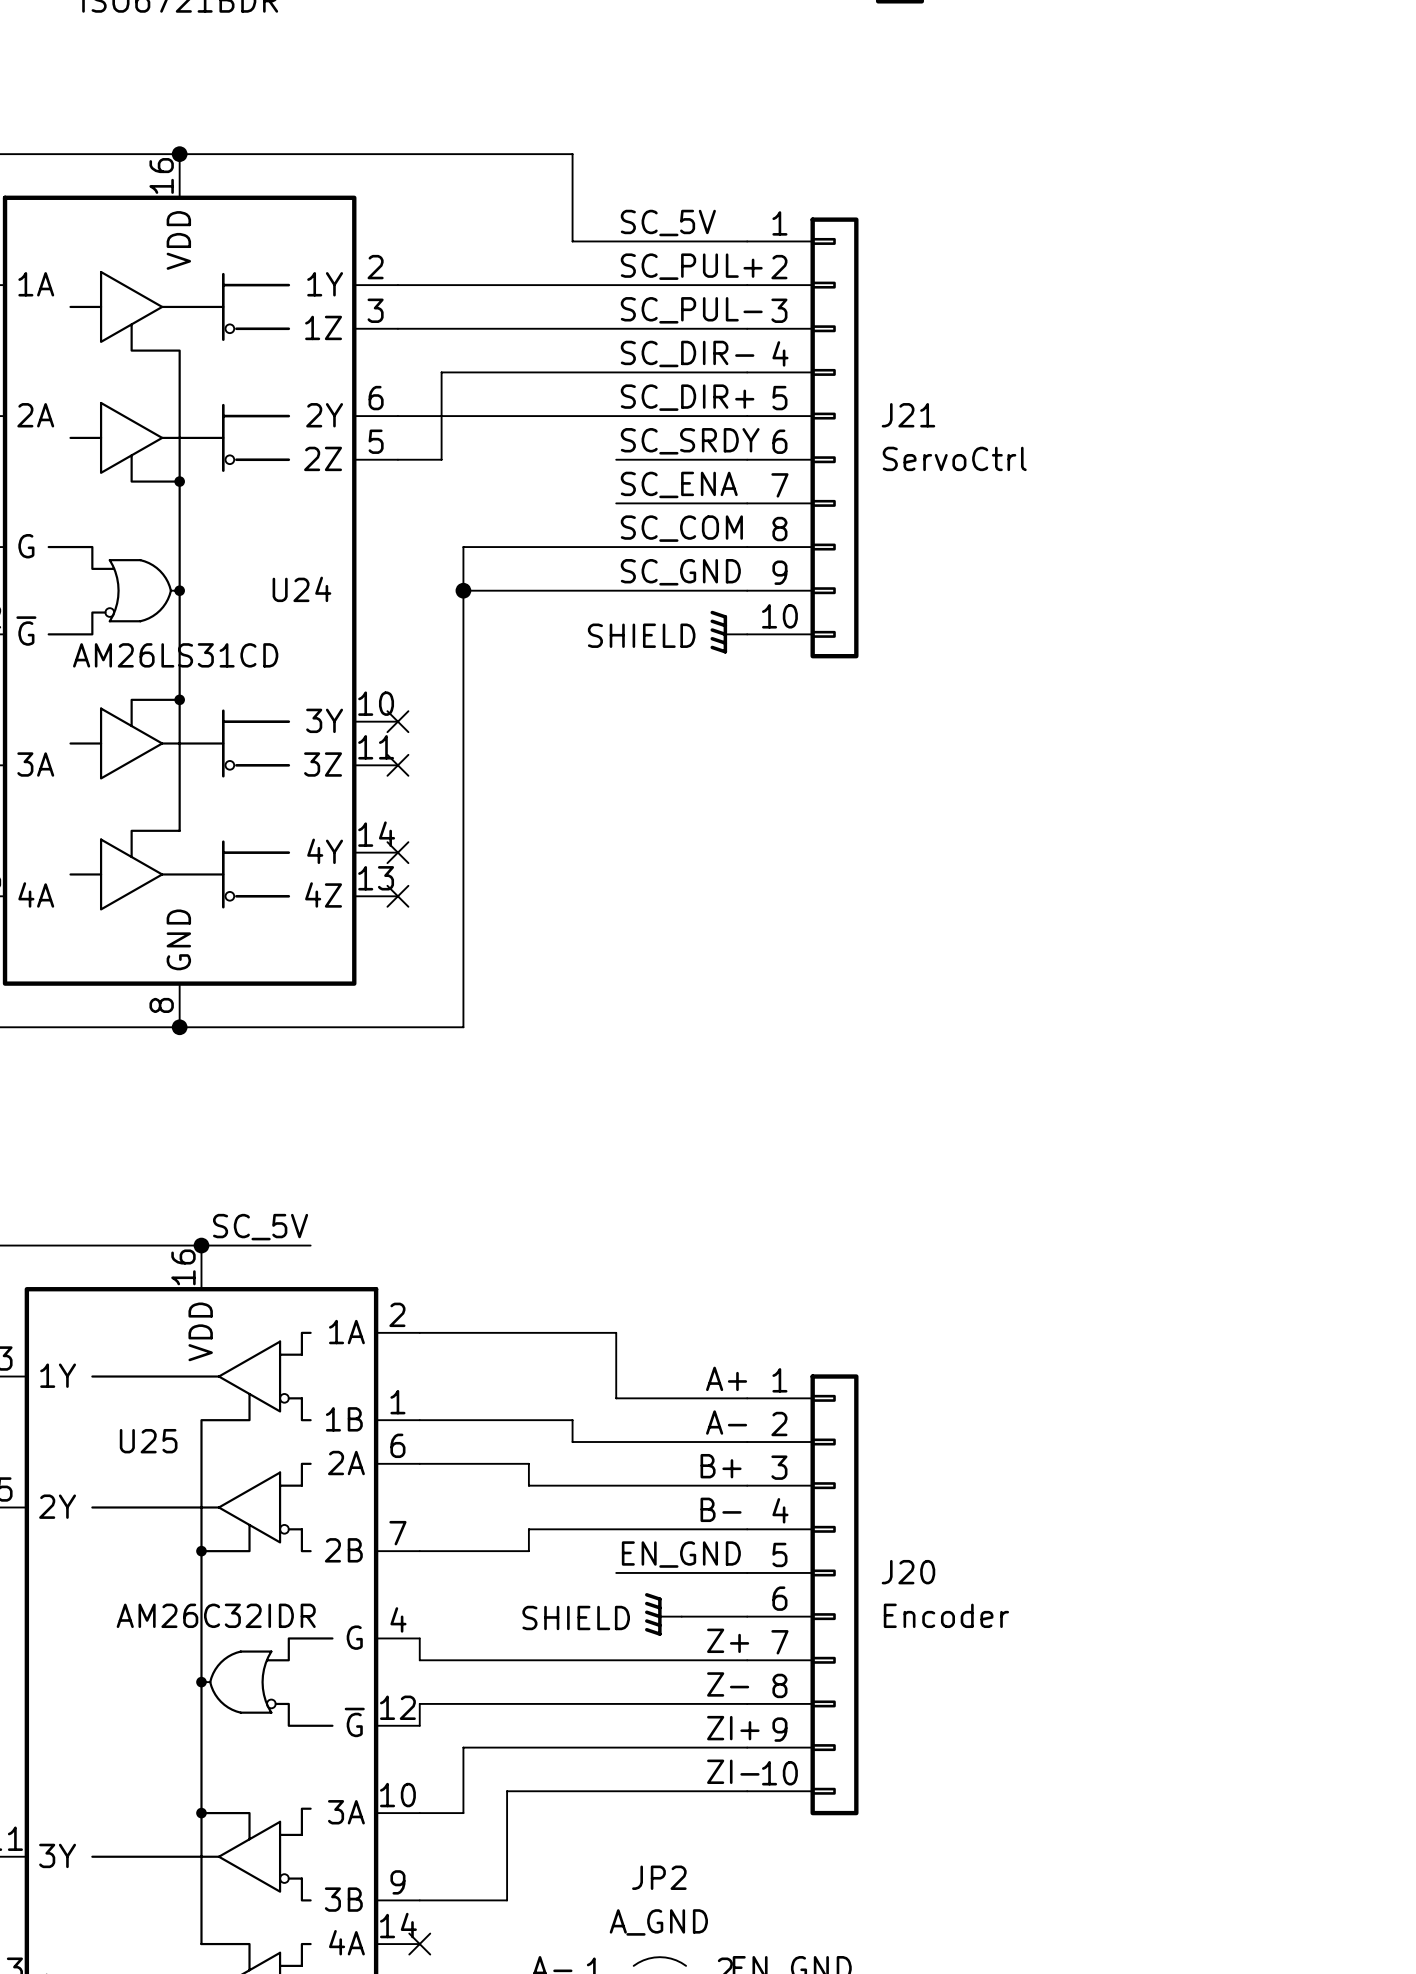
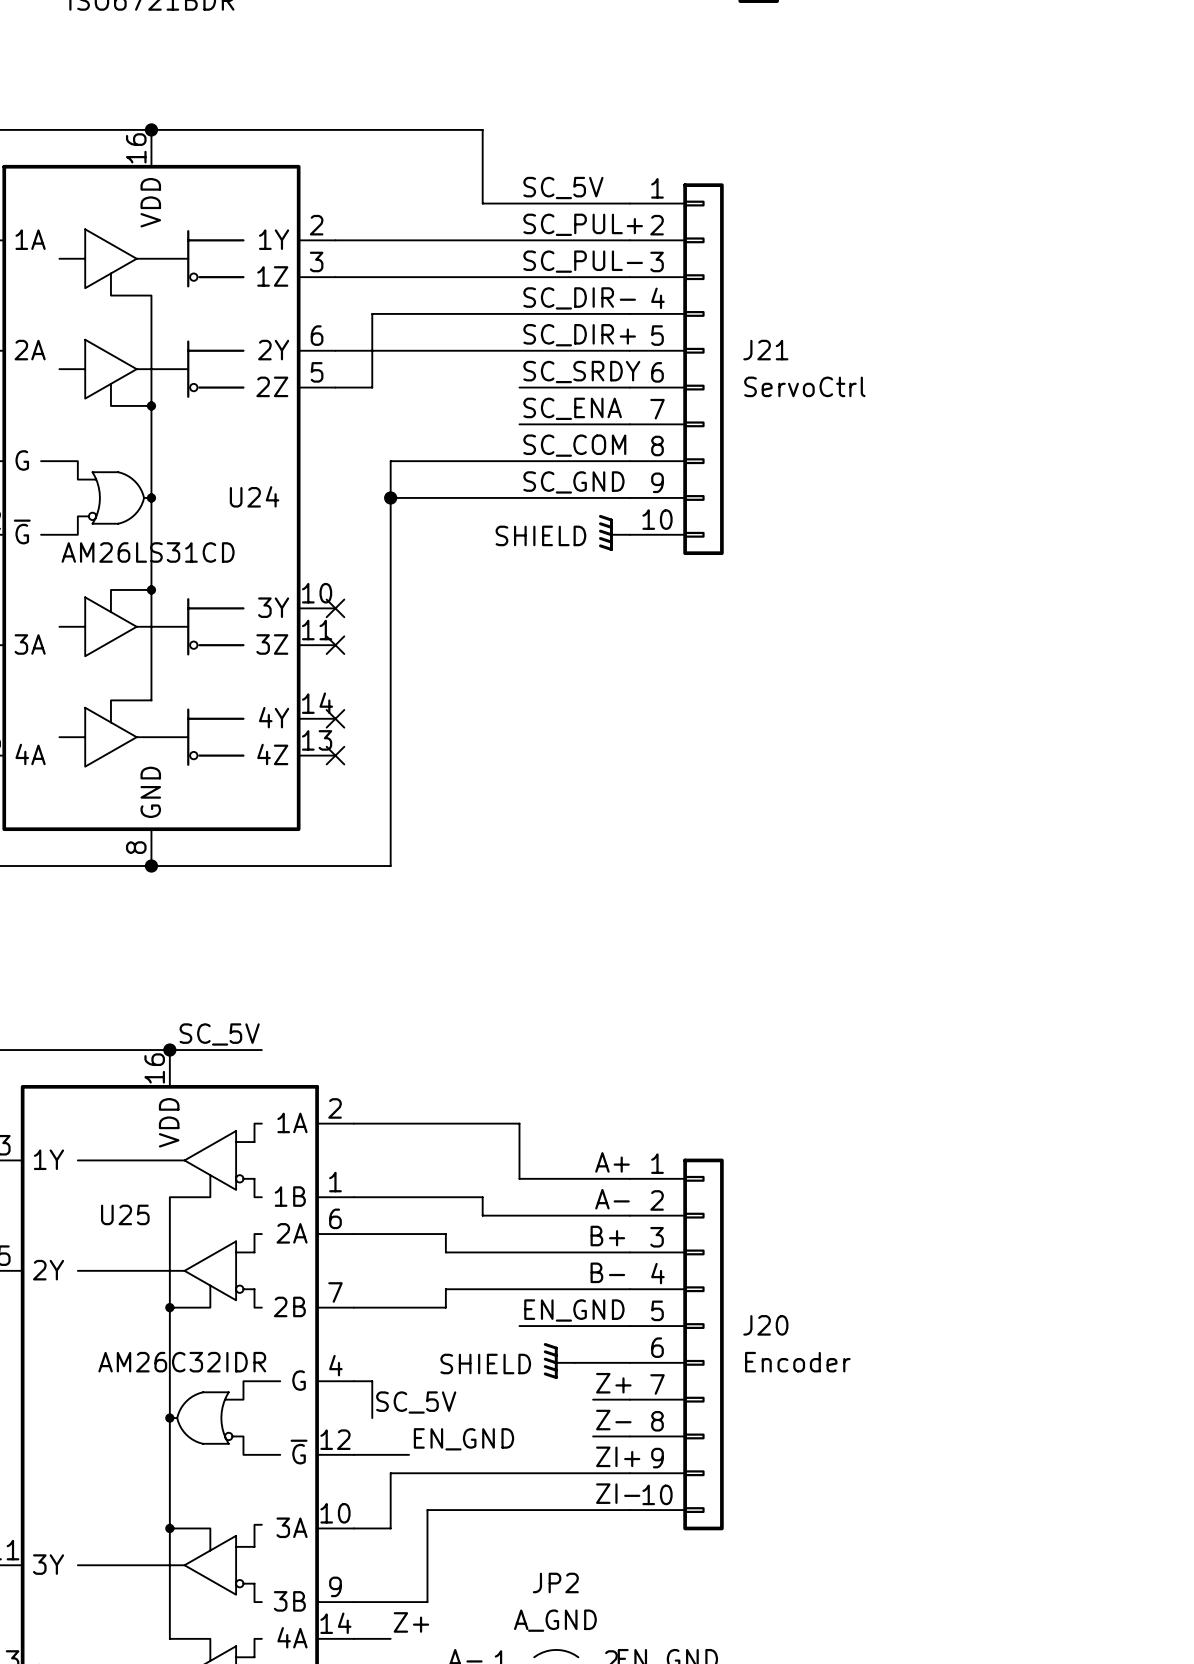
wire: (419, 1638) (419, 1660) (703, 1660) -> (353, 1381) (372, 1381) (372, 1418)
label: none -> SC_5V (416, 1402)
wire: (703, 1703) (419, 1703) (419, 1725) -> (409, 1454) (353, 1454)
label: none -> EN_GND (463, 1439)
label: none -> Z+ (411, 1622)
wire: none -> (353, 1638) (390, 1638)
no-connect mark: (419, 1944) -> none

